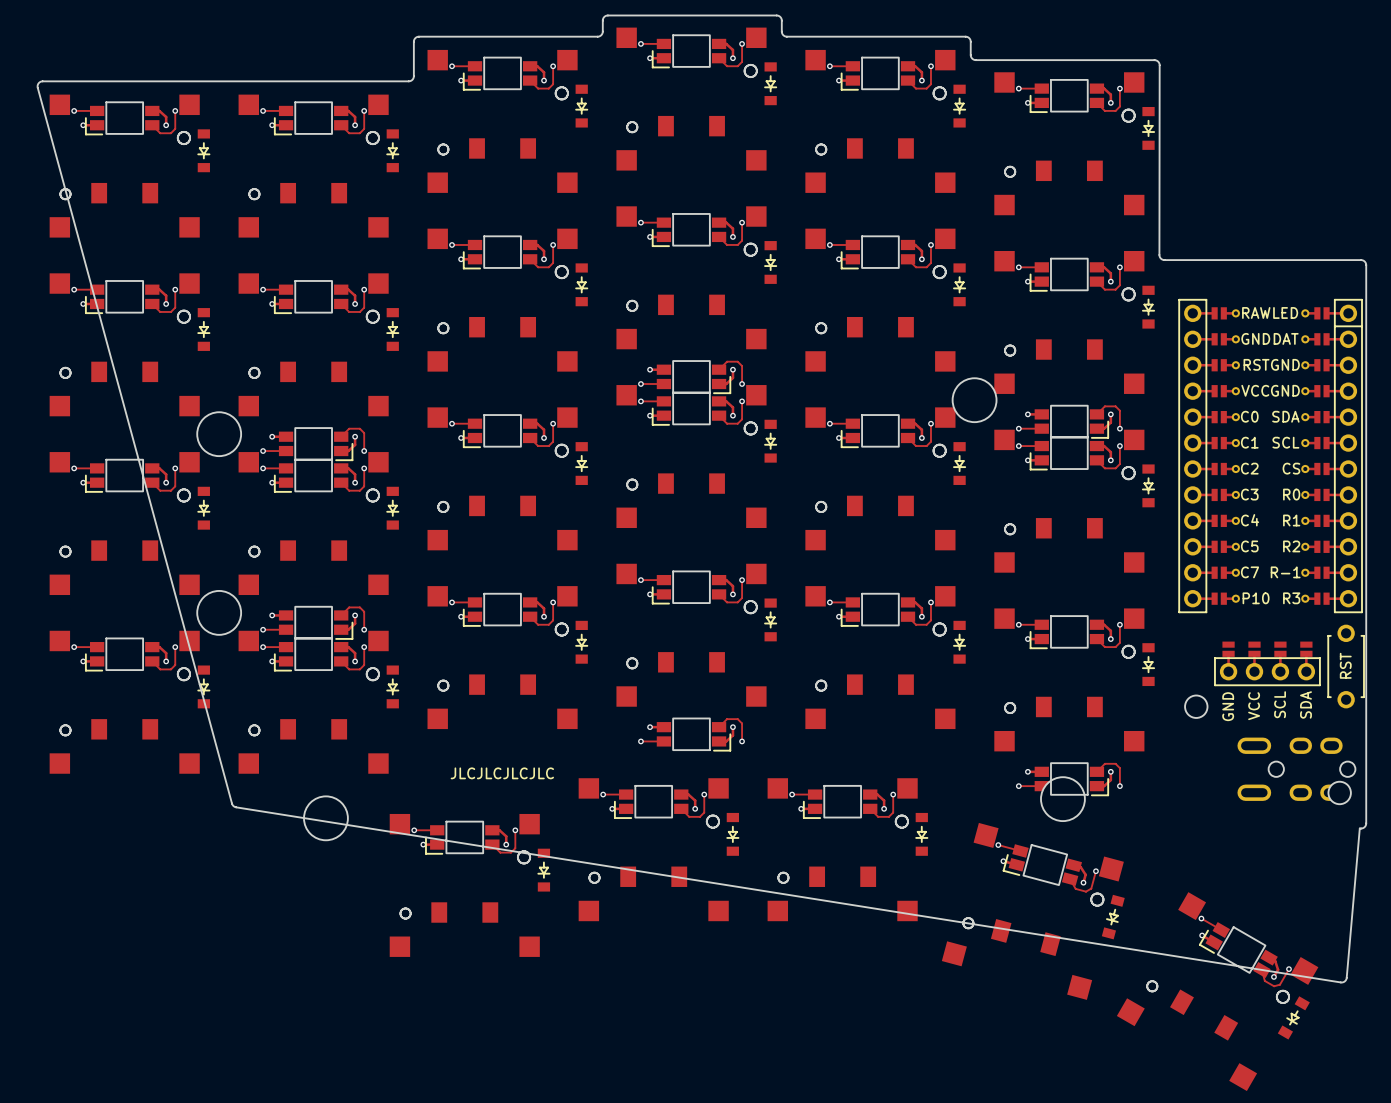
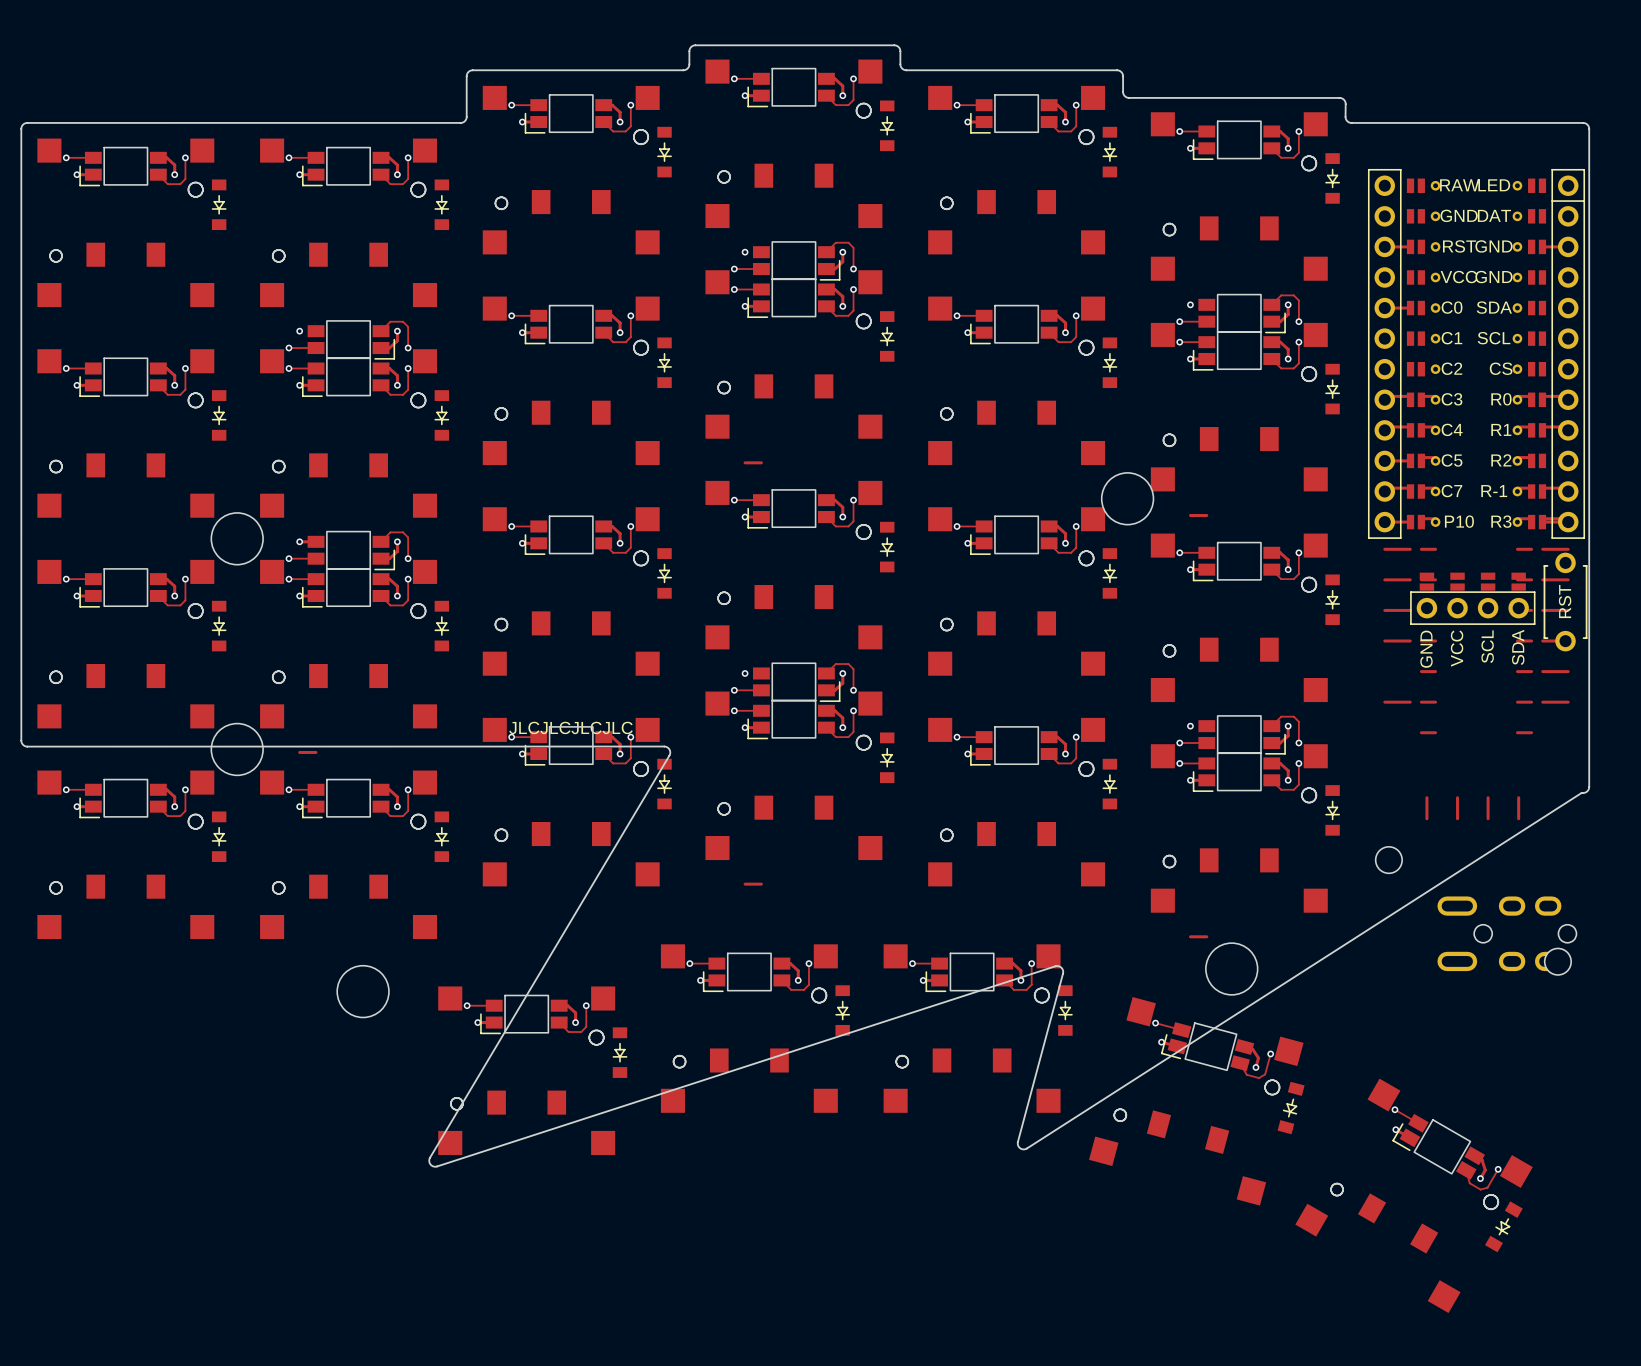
board edge: (1154, 60) (1159, 65) (1160, 258) (1361, 260) (1366, 265) -> (1339, 97) (1345, 101) (1345, 118) (1350, 122) (1583, 122) (1587, 124) (1589, 128) (1589, 339)
board edge: (42, 81) (38, 83) (37, 87) (232, 803) (235, 807) (1342, 982) (1346, 977) (1359, 828) (1363, 827) (1366, 823) (1366, 644) -> (29, 122) (23, 124) (21, 128) (21, 740) (23, 744) (27, 746) (664, 746) (669, 750) (669, 755) (430, 1157) (429, 1162) (432, 1166) (437, 1166) (1058, 966) (1062, 968) (1063, 973) (1017, 1142) (1020, 1148) (1025, 1149) (1581, 792) (1586, 792) (1589, 786)
via: none -> (745, 252)
via: none -> (842, 252)
part: none -> (796, 260)
via: none -> (734, 269)
via: none -> (853, 269)
via: none -> (1190, 304)
via: none -> (1288, 304)
part: none -> (1242, 313)
via: none -> (1179, 321)
via: none -> (1298, 321)
via: none -> (299, 331)
track: none -> (381, 331) (390, 321) (403, 321) (408, 326) (408, 348)
track: none -> (397, 331) (397, 340) (389, 348) (381, 348)
via: none -> (397, 331)
part: none -> (351, 339)
track: none -> (288, 348) (316, 348)
via: none -> (288, 348)
via: none -> (408, 348)
track: (1192, 365) (1214, 365) -> (1384, 246) (1410, 246)
track: (1326, 365) (1348, 365) -> (1542, 246) (1568, 246)
via: (650, 369) -> none
track: (719, 369) (727, 361) (737, 361) (742, 366) (742, 384) -> (826, 252) (835, 242) (848, 242) (853, 247) (853, 269)
track: (732, 369) (732, 377) (726, 384) (719, 384) -> (842, 252) (842, 261) (834, 269) (826, 269)
via: (732, 369) -> none
part: (693, 377) -> none
track: (640, 384) (663, 384) -> (734, 269) (761, 269)
via: (640, 384) -> none
via: (742, 384) -> none
via: (1027, 414) -> none
track: (1096, 414) (1104, 406) (1115, 406) (1119, 410) (1119, 428) -> (1271, 304) (1281, 295) (1293, 295) (1298, 300) (1298, 321)
track: (1110, 414) (1110, 422) (1104, 428) (1096, 428) -> (1288, 304) (1288, 314) (1280, 321) (1271, 321)
via: (1110, 414) -> none
track: (1192, 417) (1214, 417) -> (1384, 308) (1410, 308)
part: (1071, 421) -> none
track: (1018, 428) (1041, 428) -> (1179, 321) (1206, 321)
via: (1018, 428) -> none
via: (1119, 428) -> none
part position: (1270, 456) -> (1476, 353)
track: (1192, 546) (1214, 546) -> (1384, 460) (1410, 460)
via: none -> (745, 673)
via: none -> (842, 673)
part: none -> (796, 682)
via: none -> (734, 690)
via: none -> (853, 690)
via: none -> (1190, 726)
via: none -> (1288, 726)
track: (1192, 598) (1214, 598) -> (1384, 522) (1410, 522)
track: (1326, 598) (1348, 598) -> (1542, 522) (1568, 522)
part: none -> (1242, 734)
via: none -> (1179, 743)
via: none -> (1298, 743)
via: (272, 615) -> none
track: (341, 615) (349, 607) (359, 607) (364, 611) (364, 629) -> none
track: (355, 615) (355, 623) (348, 629) (341, 629) -> none
via: (355, 615) -> none
part: (315, 622) -> none
track: (263, 629) (286, 629) -> none
via: (263, 629) -> none
via: (364, 629) -> none
part position: (1267, 663) -> (1472, 598)
part position: (1346, 666) -> (1565, 602)
via: (650, 727) -> none
track: (719, 727) (727, 719) (737, 719) (742, 723) (742, 741) -> (826, 673) (835, 664) (848, 664) (853, 669) (853, 690)
track: (732, 727) (732, 735) (726, 741) (719, 741) -> (842, 673) (842, 683) (834, 690) (826, 690)
via: (732, 727) -> none
part: (693, 734) -> none
track: (640, 741) (663, 741) -> (734, 690) (761, 690)
via: (640, 741) -> none
via: (742, 741) -> none
via: (1027, 771) -> none
track: (1096, 771) (1104, 763) (1115, 763) (1119, 768) (1119, 786) -> (1271, 726) (1281, 716) (1293, 716) (1298, 721) (1298, 743)
track: (1110, 771) (1110, 780) (1104, 786) (1096, 786) -> (1288, 726) (1288, 735) (1280, 743) (1271, 743)
via: (1110, 771) -> none
text position: JLCJLCJLCJLC (502, 773) -> JLCJLCJLCJLC (571, 727)
part: (1071, 779) -> none
track: (1018, 786) (1041, 786) -> (1179, 743) (1206, 743)
via: (1018, 786) -> none
via: (1119, 786) -> none

